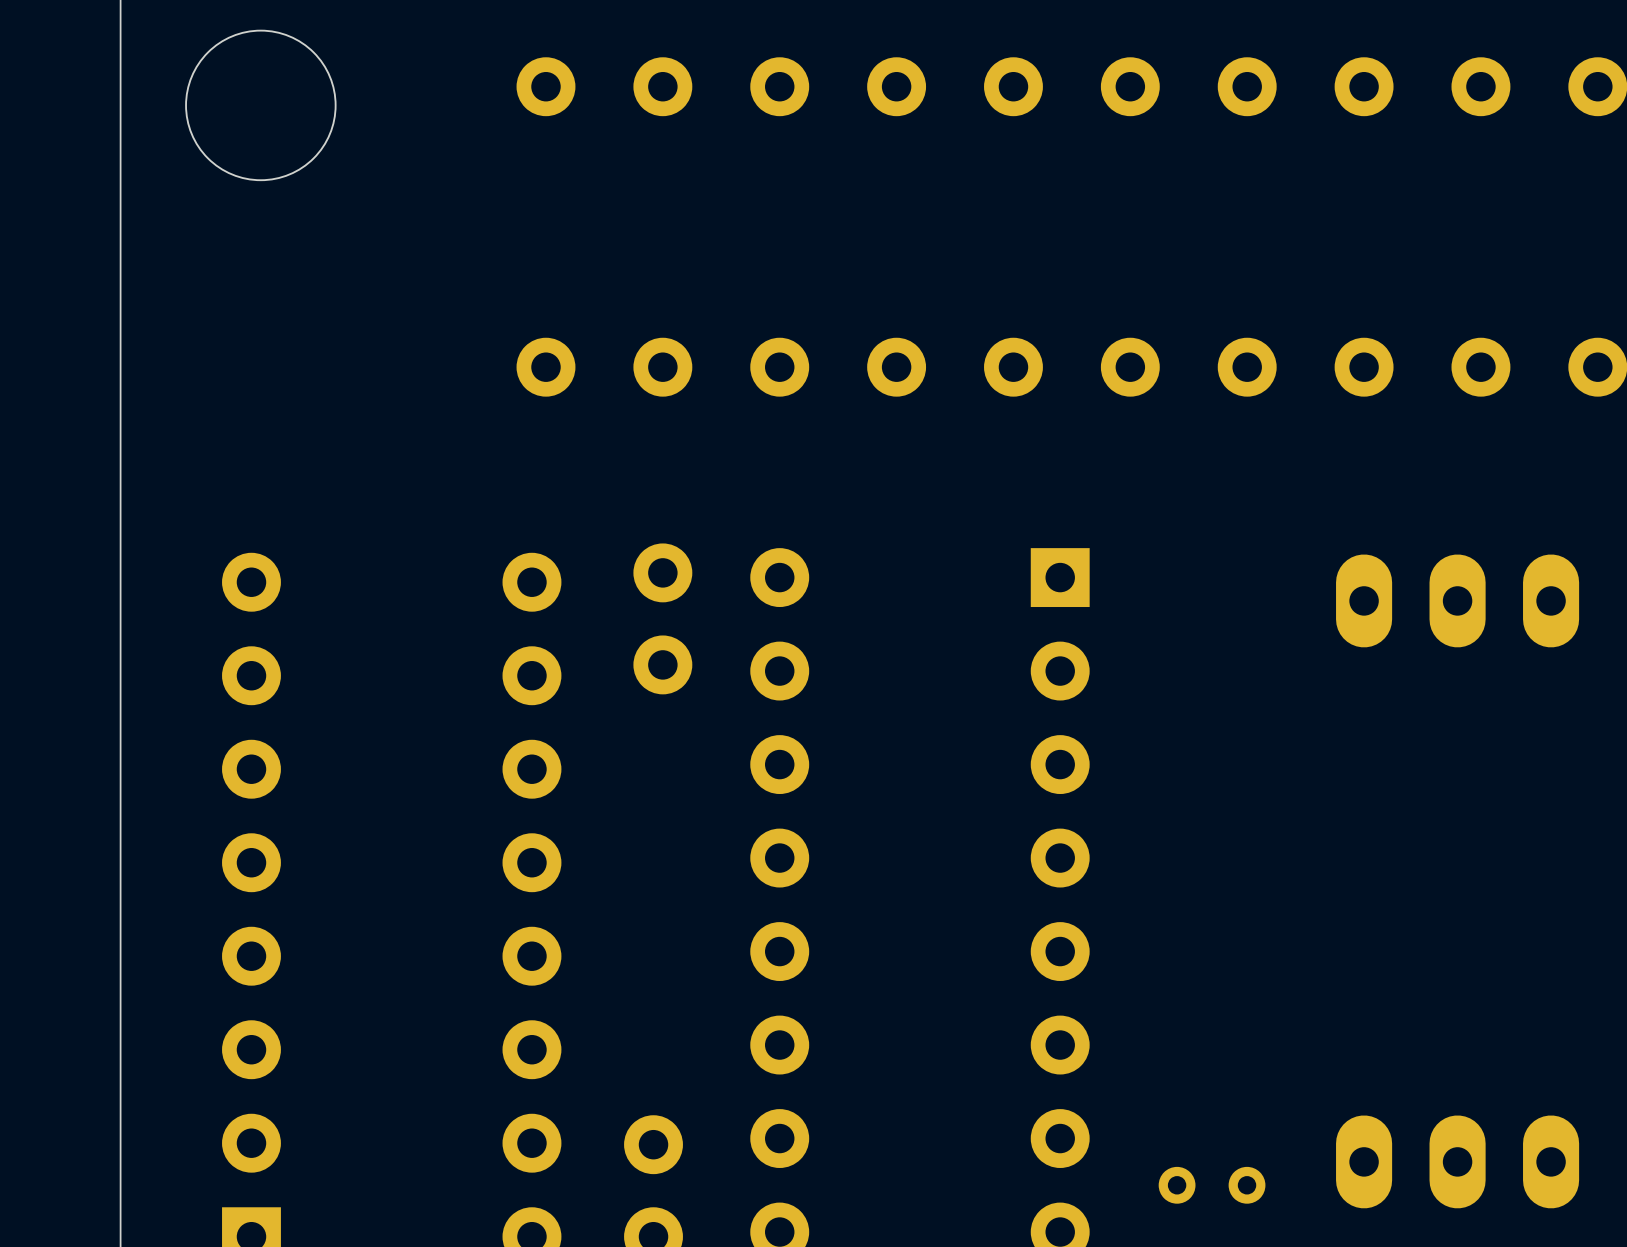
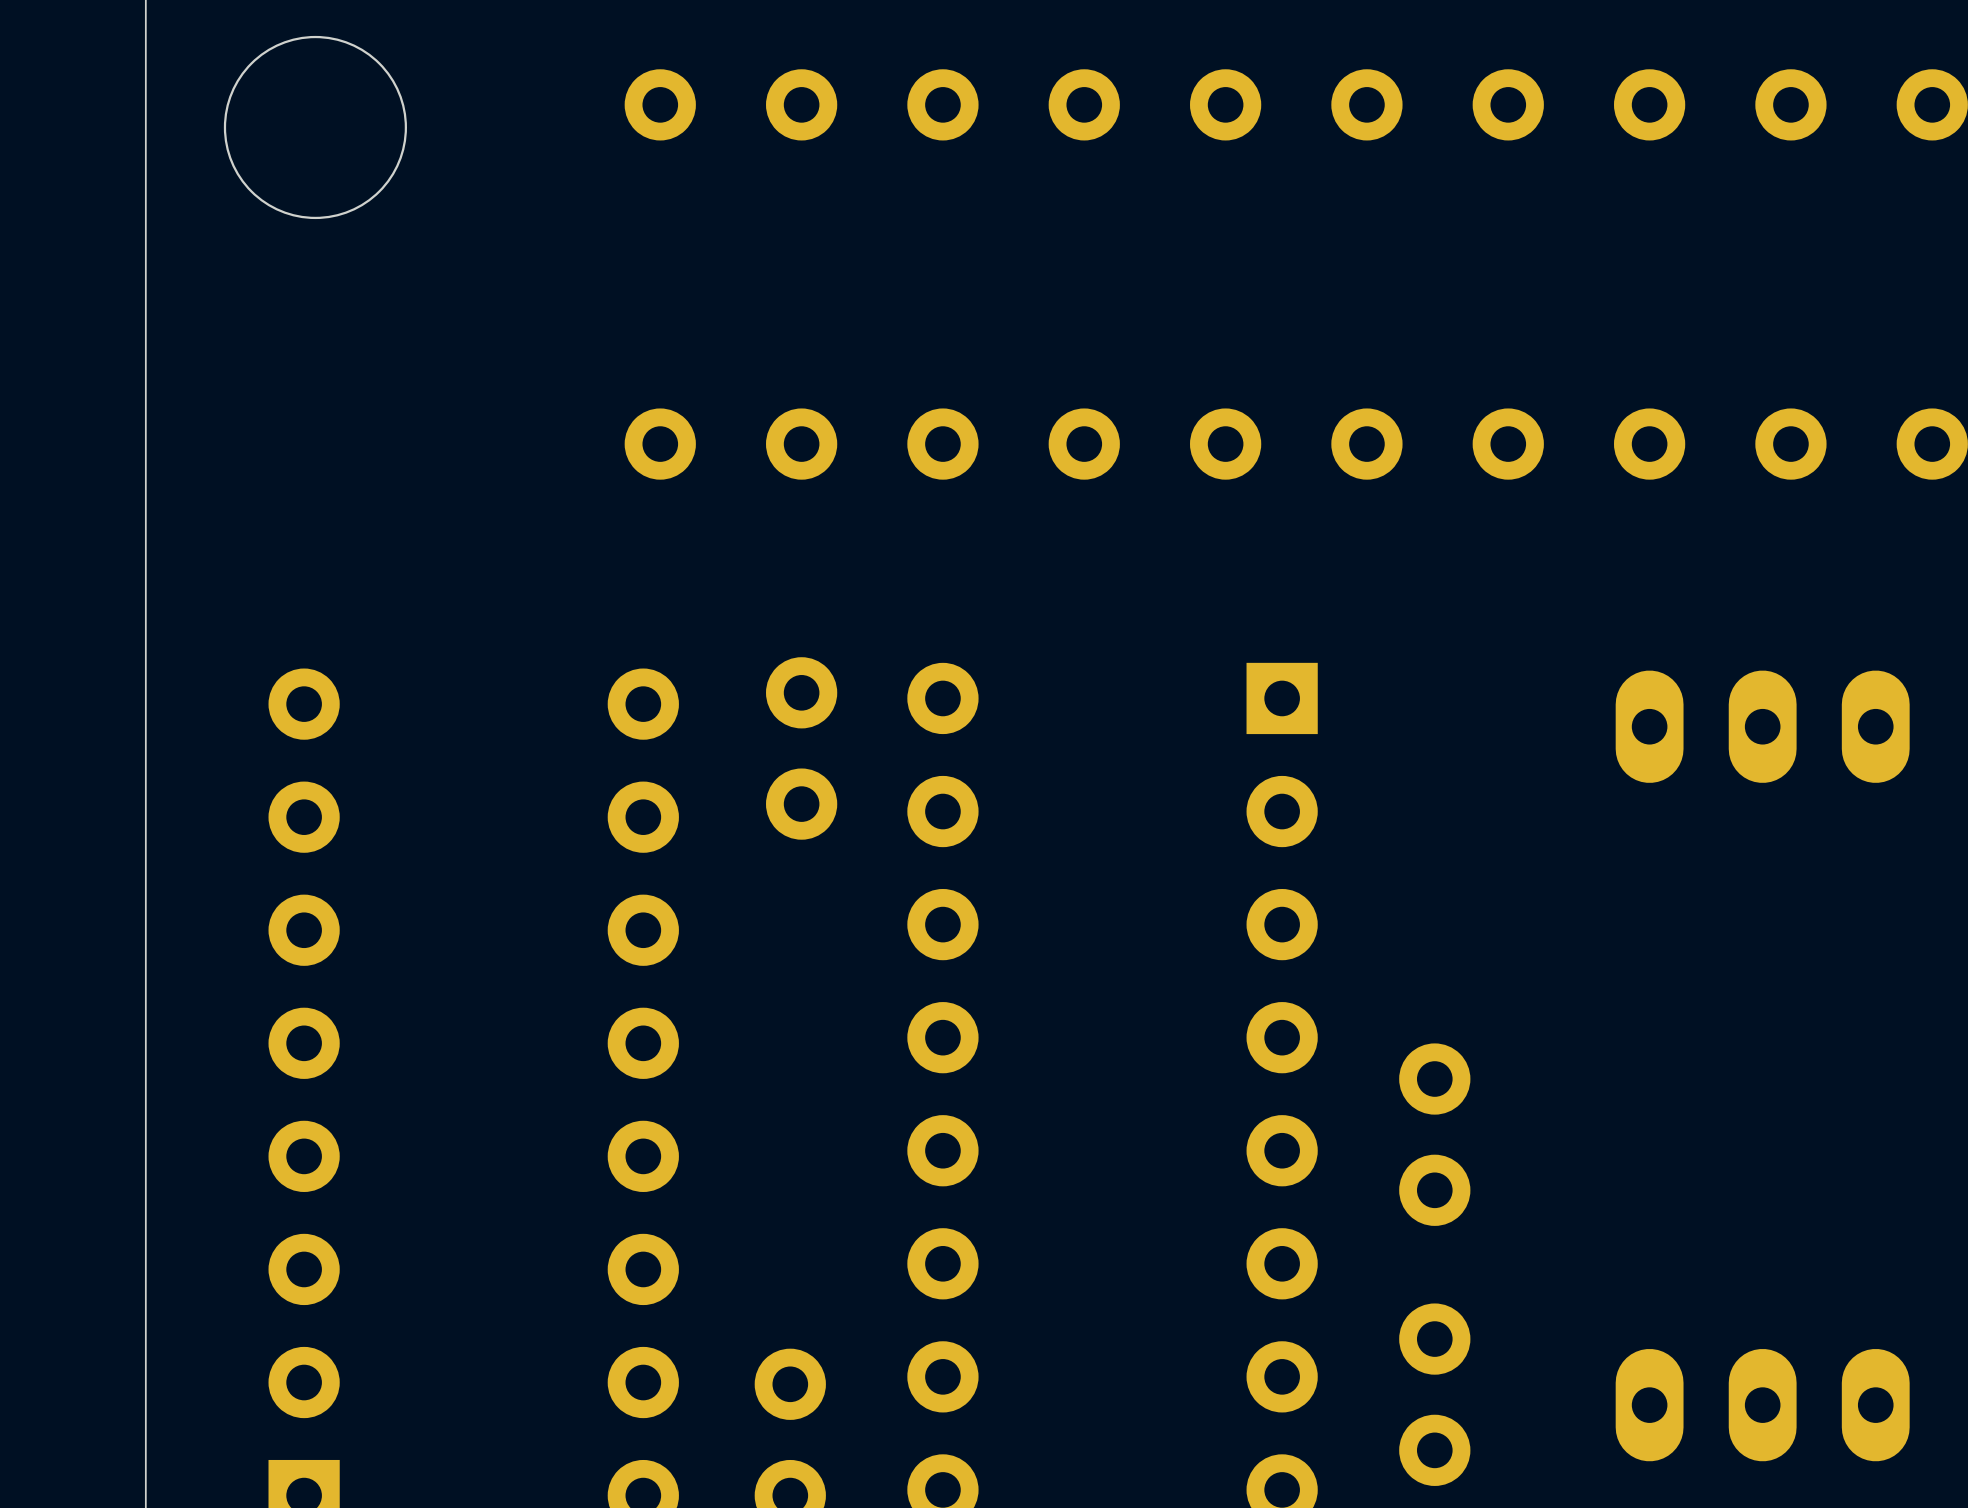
part: none -> (1434, 1134)
part: none -> (1434, 1394)
part: (1212, 1185) -> none

